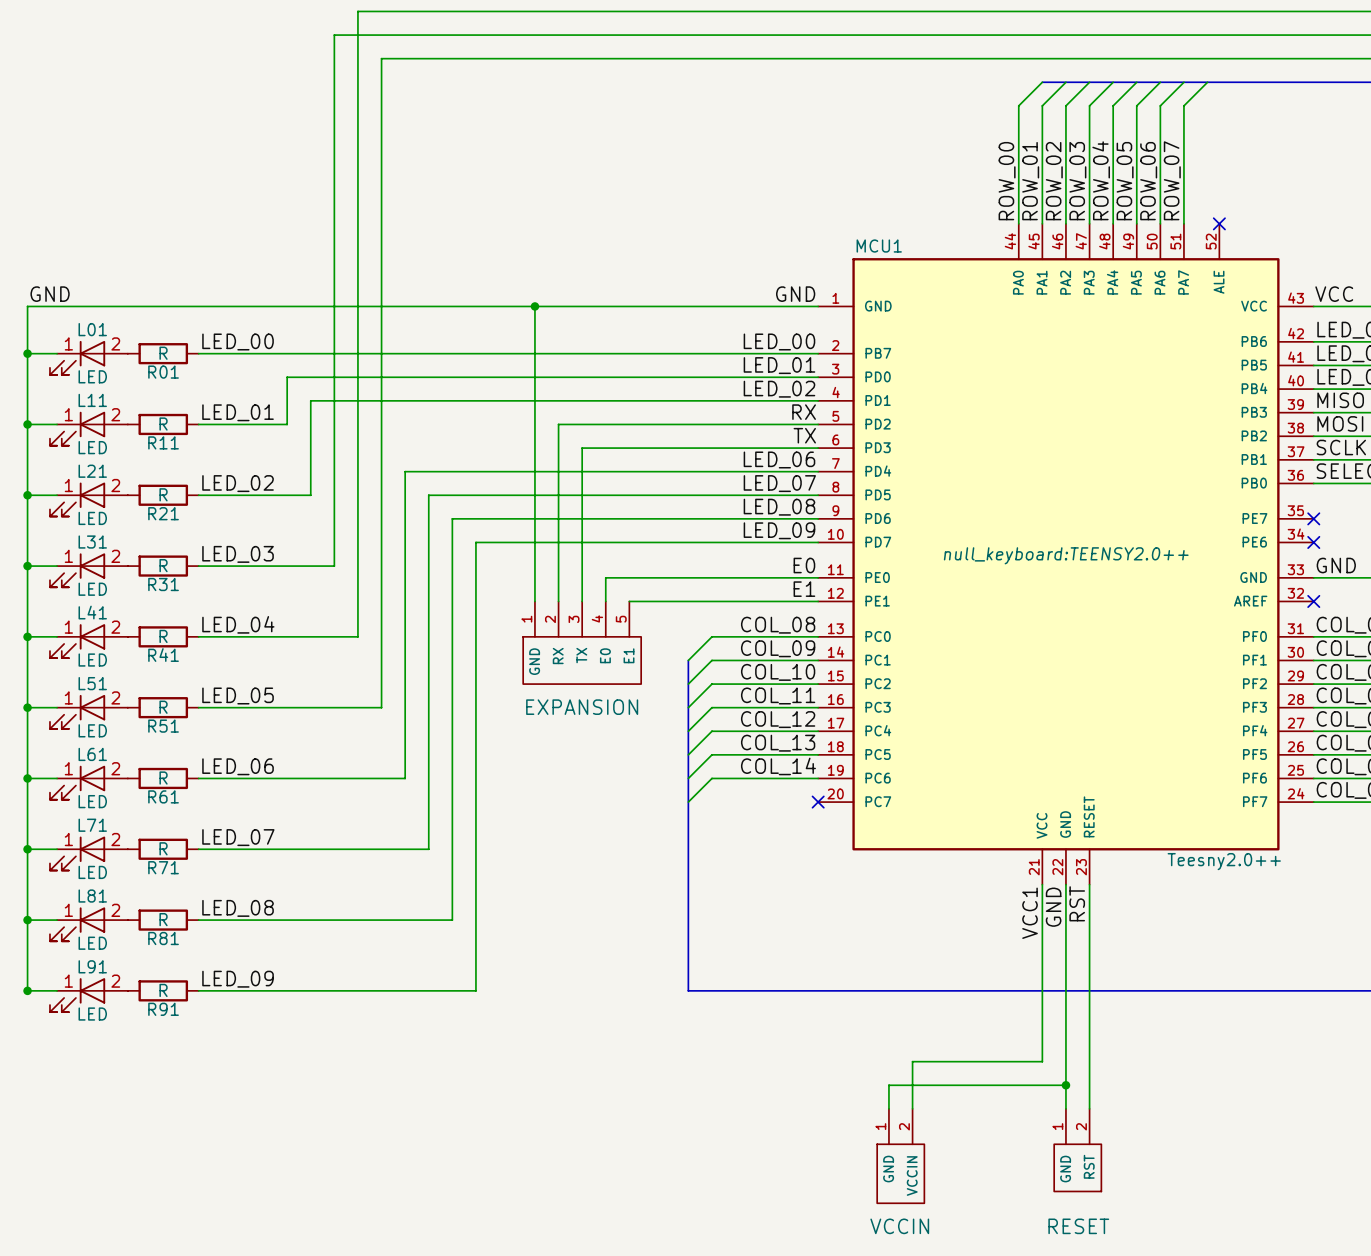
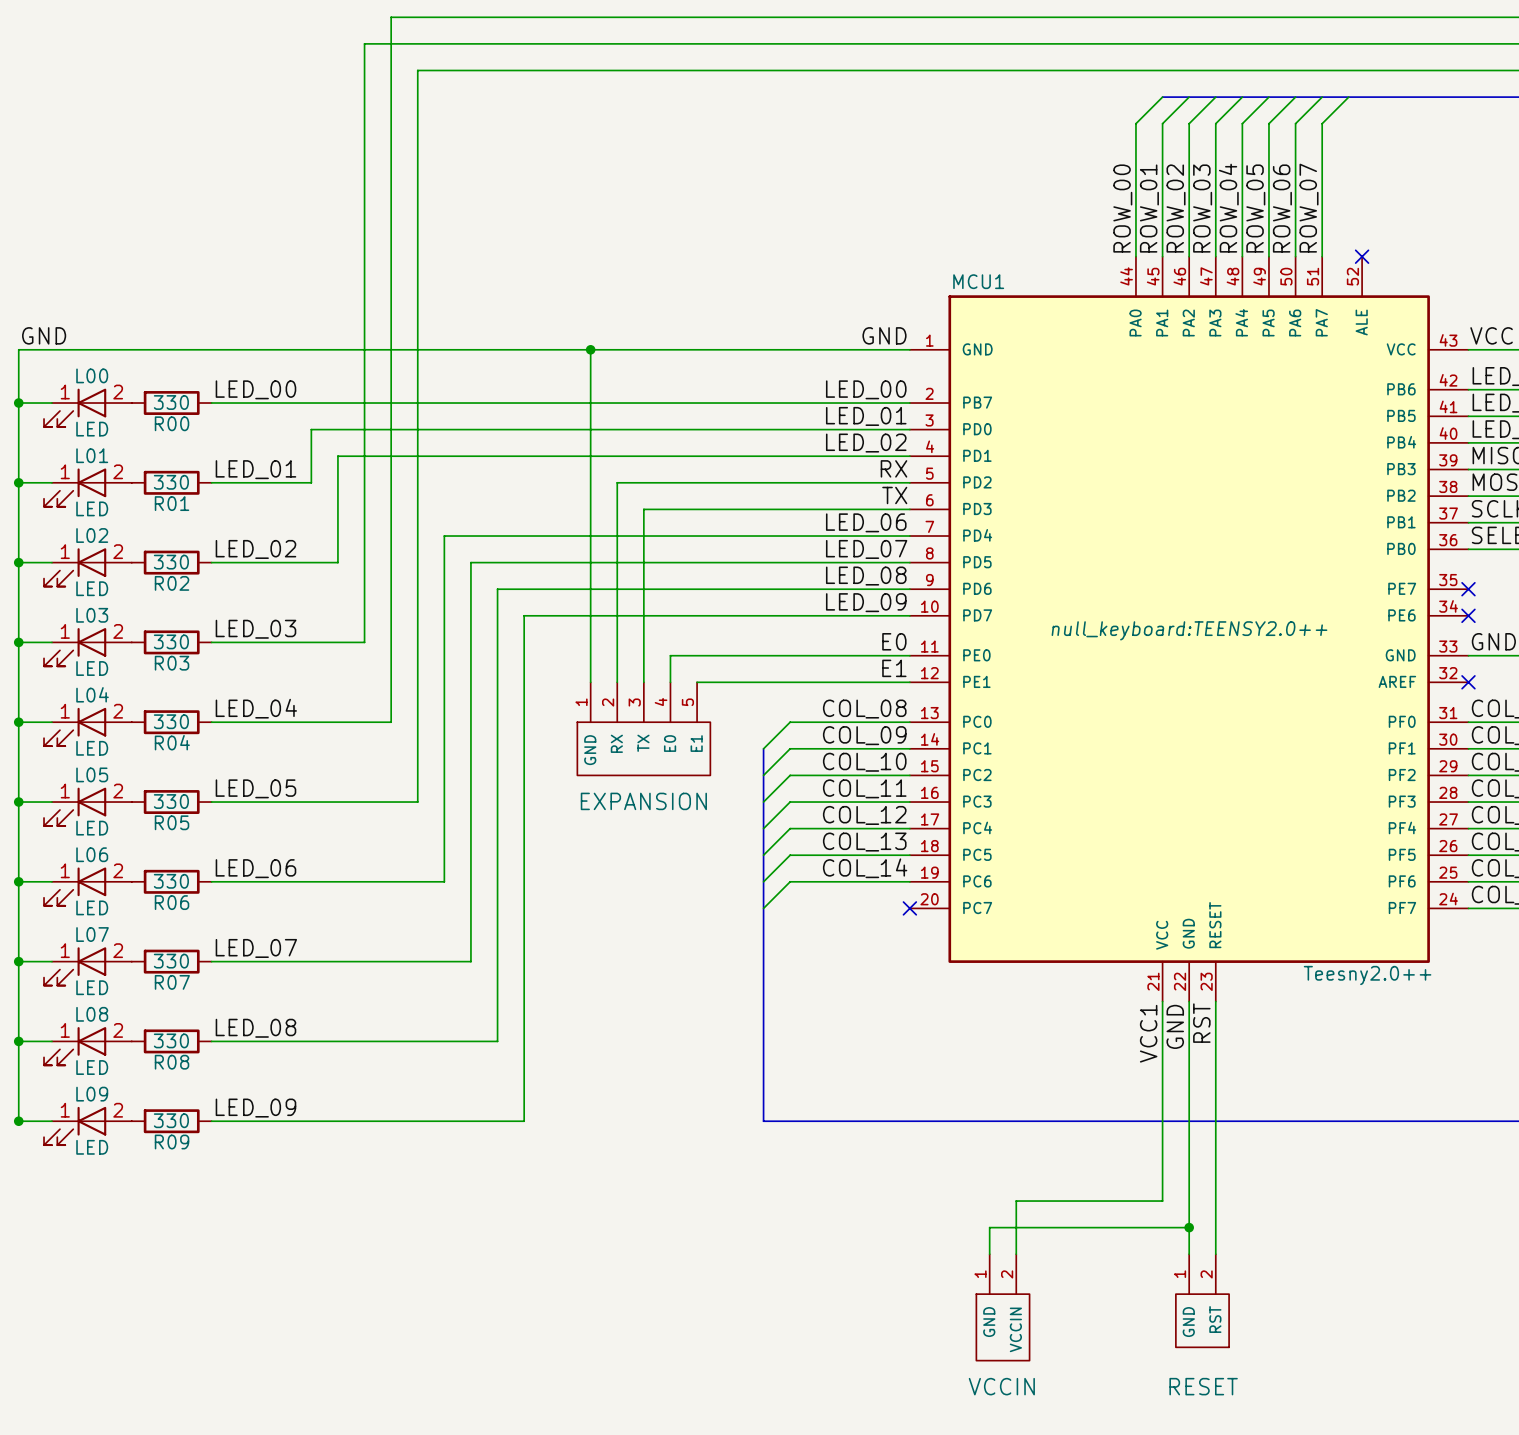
L01 name: L01 (92, 329) -> L00 (92, 375)
R01 value: R (163, 353) -> 330 (171, 402)
R01 name: R01 (163, 372) -> R00 (172, 423)
L11 name: L11 (92, 400) -> L01 (92, 455)
R11 value: R (163, 424) -> 330 (171, 482)
R11 name: R11 (163, 442) -> R01 (172, 503)
L21 name: L21 (92, 471) -> L02 (92, 535)
R21 value: R (163, 494) -> 330 (171, 562)
R21 name: R21 (163, 513) -> R02 (172, 583)
L31 name: L31 (92, 542) -> L03 (92, 615)
R31 value: R (163, 565) -> 330 (171, 641)
R31 name: R31 (163, 584) -> R03 (172, 663)
L41 name: L41 (92, 612) -> L04 (92, 694)
R41 value: R (163, 636) -> 330 (171, 721)
R41 name: R41 (163, 655) -> R04 (172, 742)
L51 name: L51 (92, 683) -> L05 (92, 774)
R51 value: R (163, 707) -> 330 (171, 801)
R51 name: R51 (163, 726) -> R05 (172, 822)
L61 name: L61 (92, 754) -> L06 (92, 854)
R61 value: R (163, 778) -> 330 (171, 881)
R61 name: R61 (163, 796) -> R06 (172, 902)
L71 name: L71 (92, 825) -> L07 (92, 934)
R71 value: R (163, 848) -> 330 (171, 961)
R71 name: R71 (163, 867) -> R07 (172, 982)
L81 name: L81 (92, 896) -> L08 (92, 1014)
R81 value: R (163, 919) -> 330 (171, 1040)
R81 name: R81 (163, 938) -> R08 (172, 1062)
L91 name: L91 (92, 966) -> L09 (92, 1094)
R91 value: R (163, 990) -> 330 (171, 1120)
R91 name: R91 (163, 1009) -> R09 (172, 1142)

